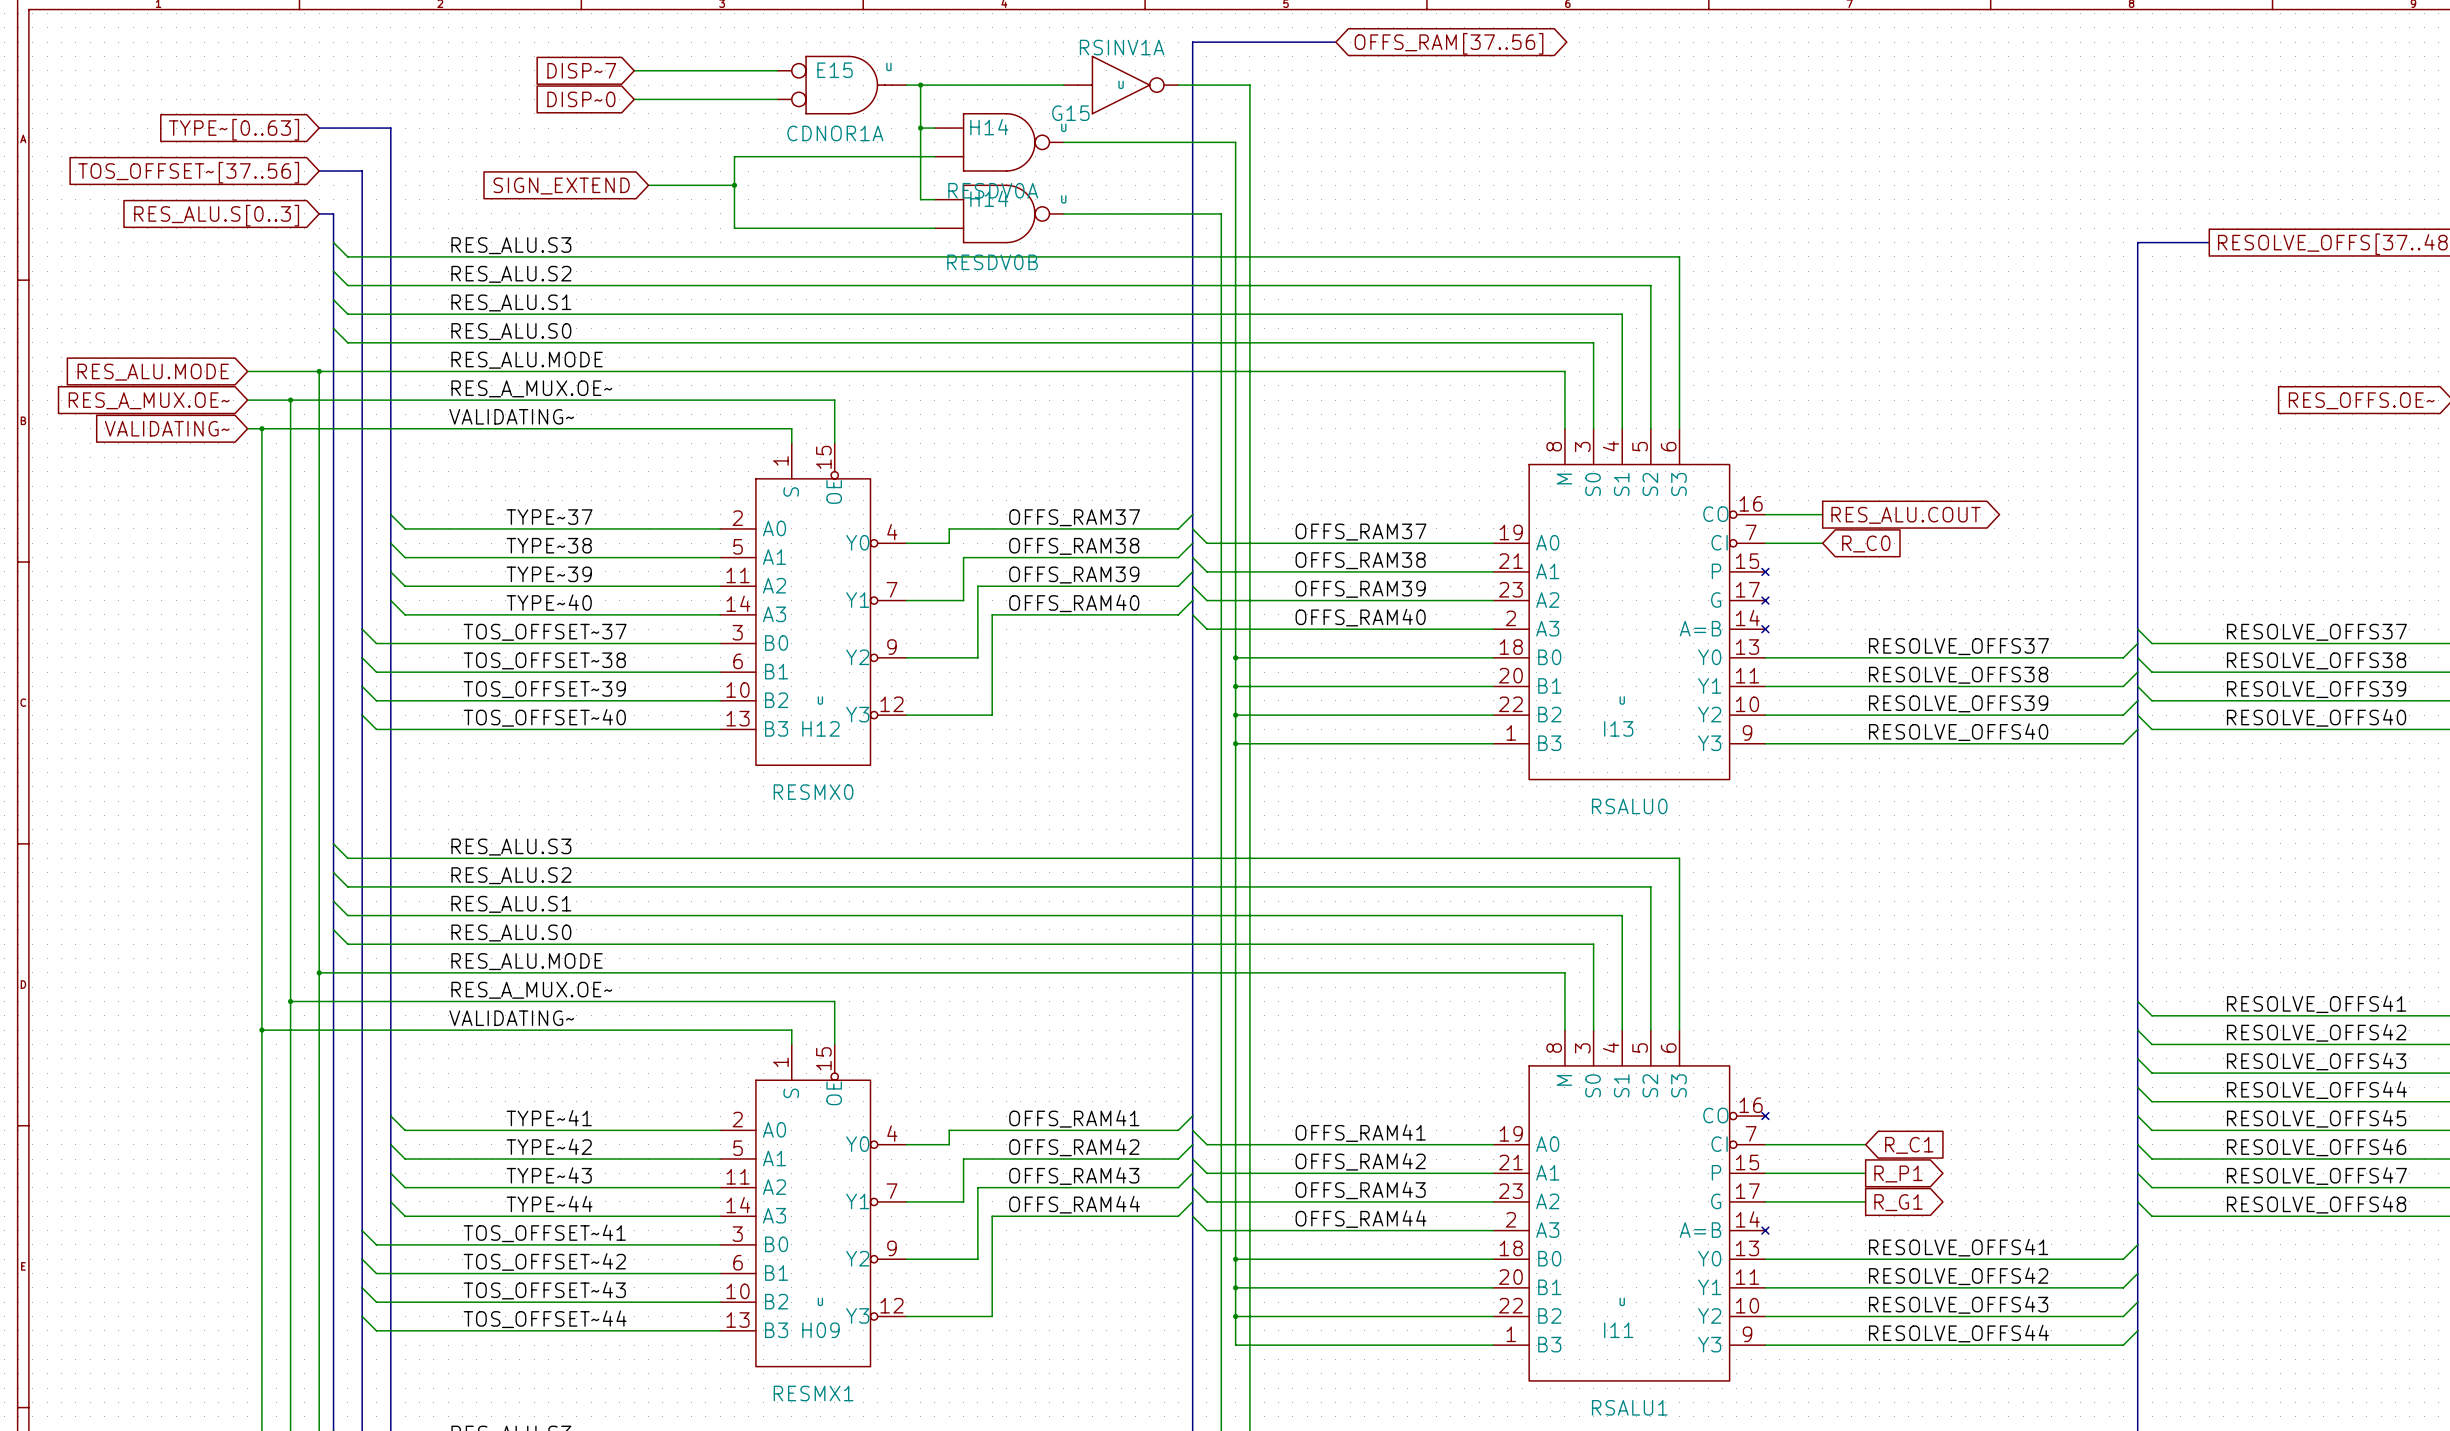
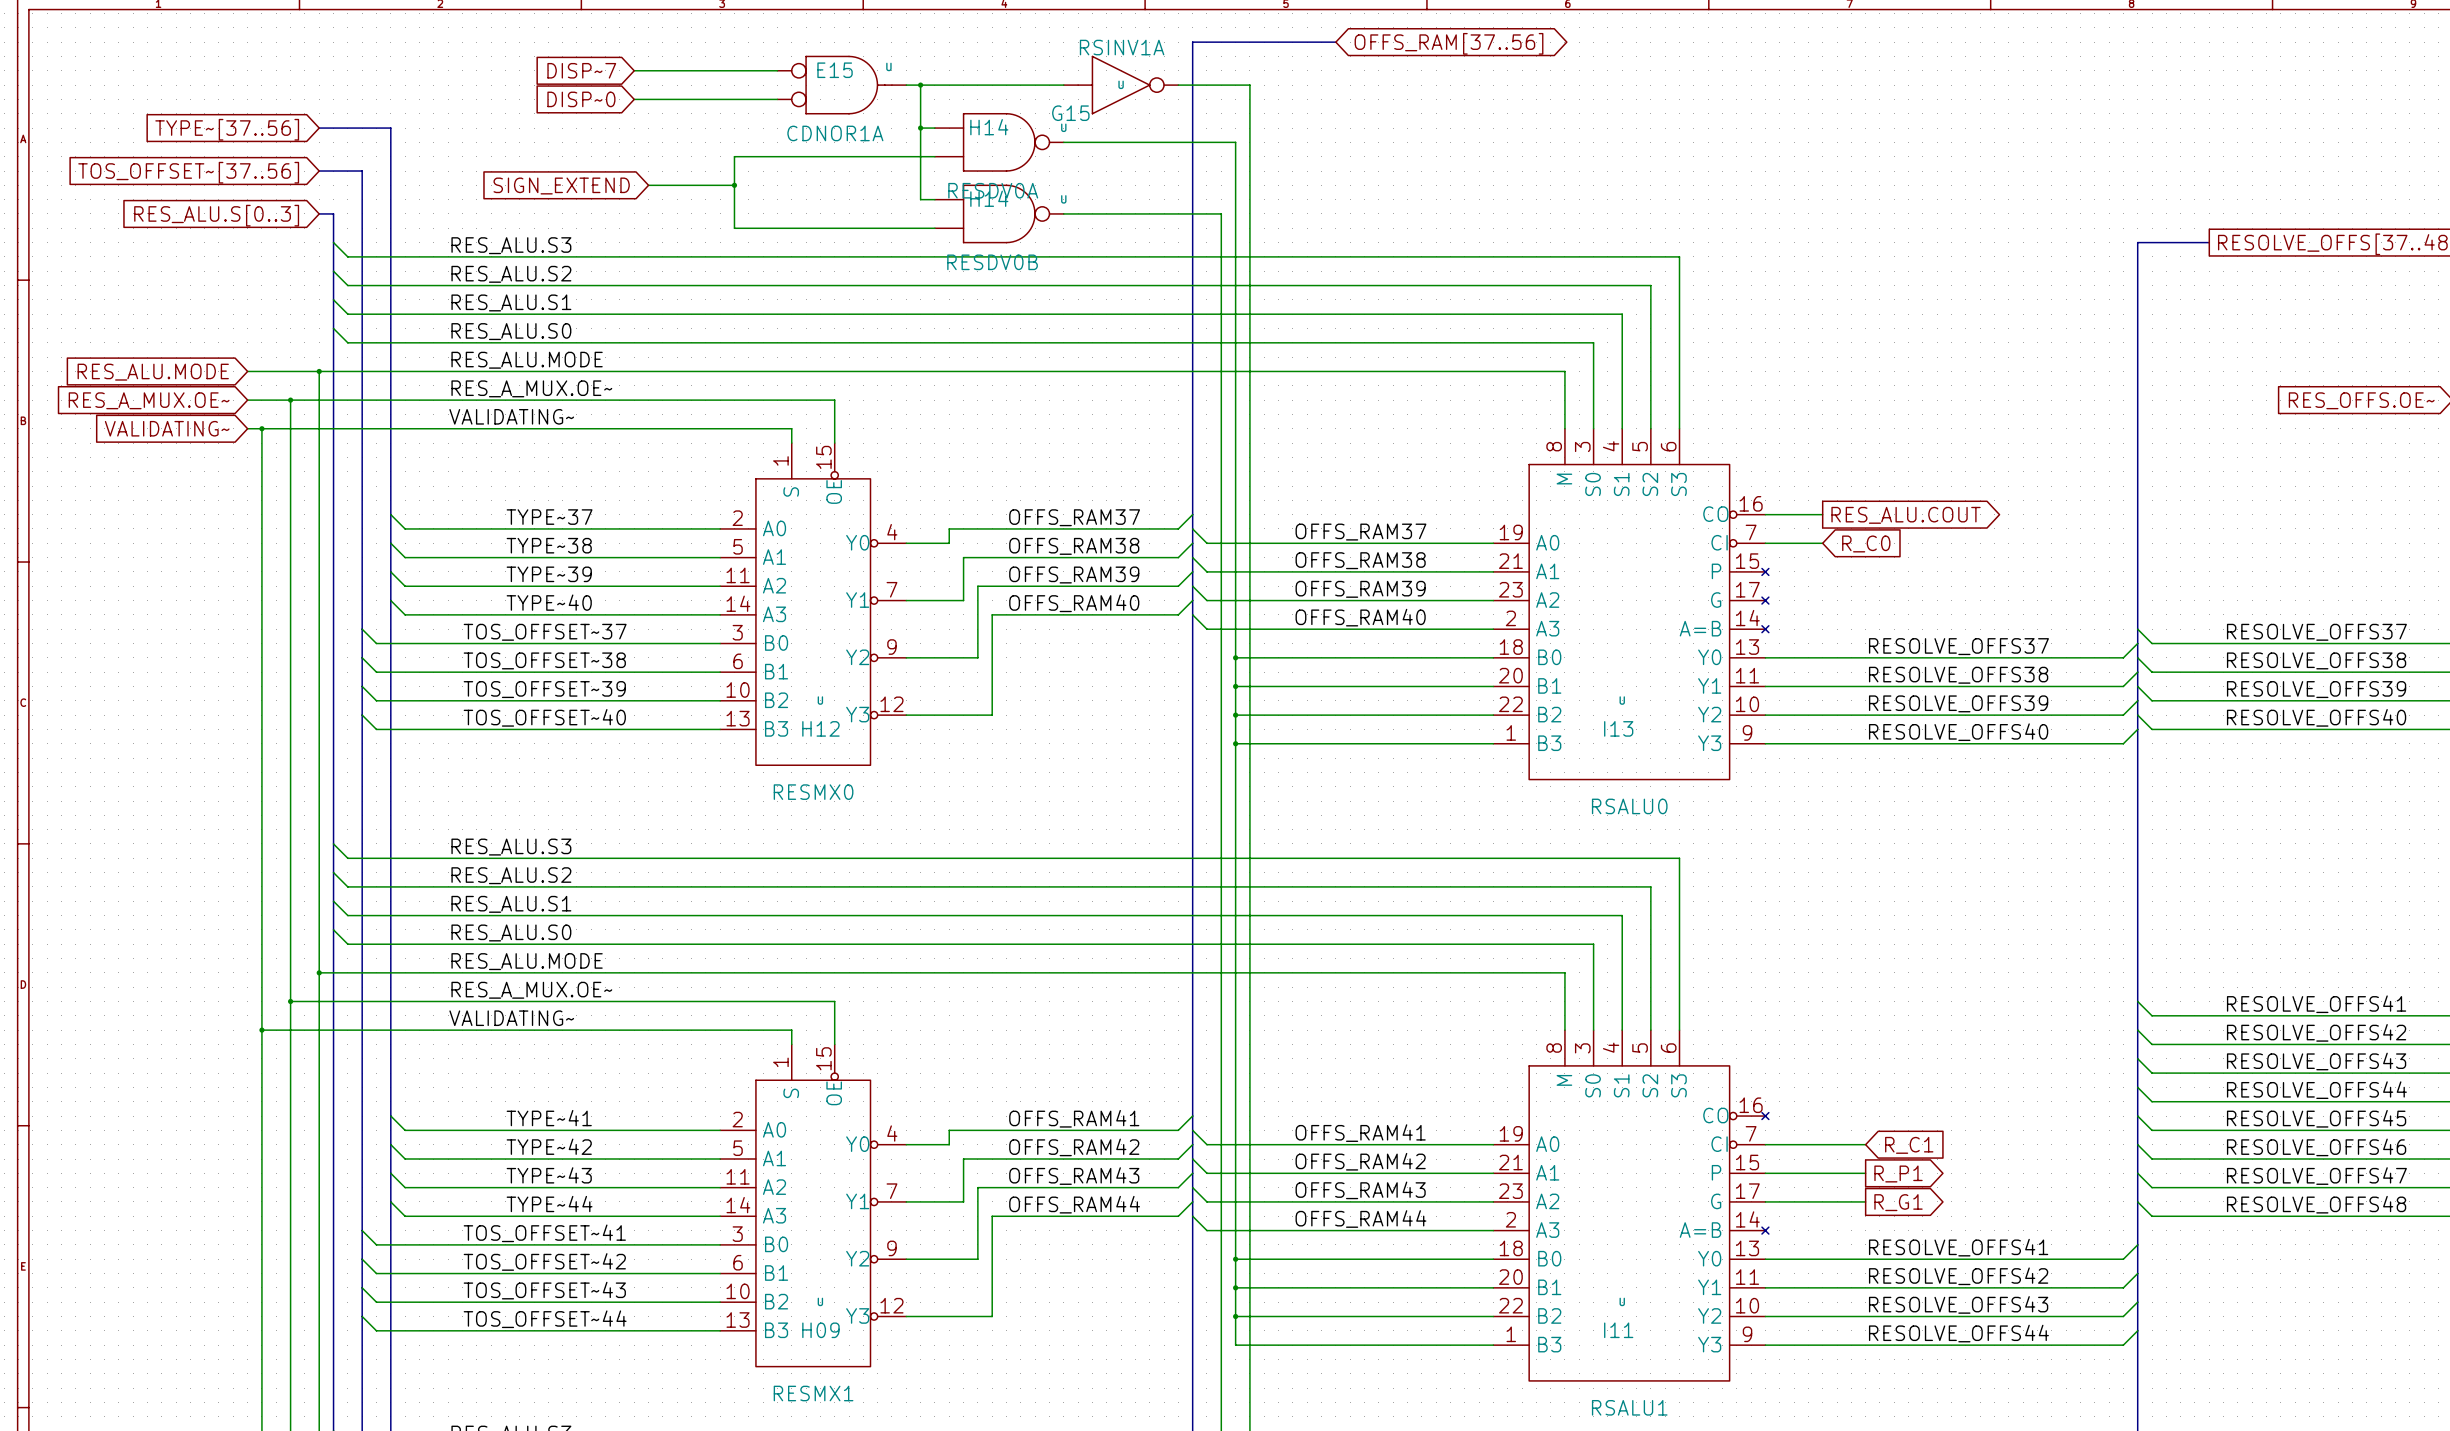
global label: TYPE~[0..63] (234, 129) -> TYPE~[37..56] (227, 129)

